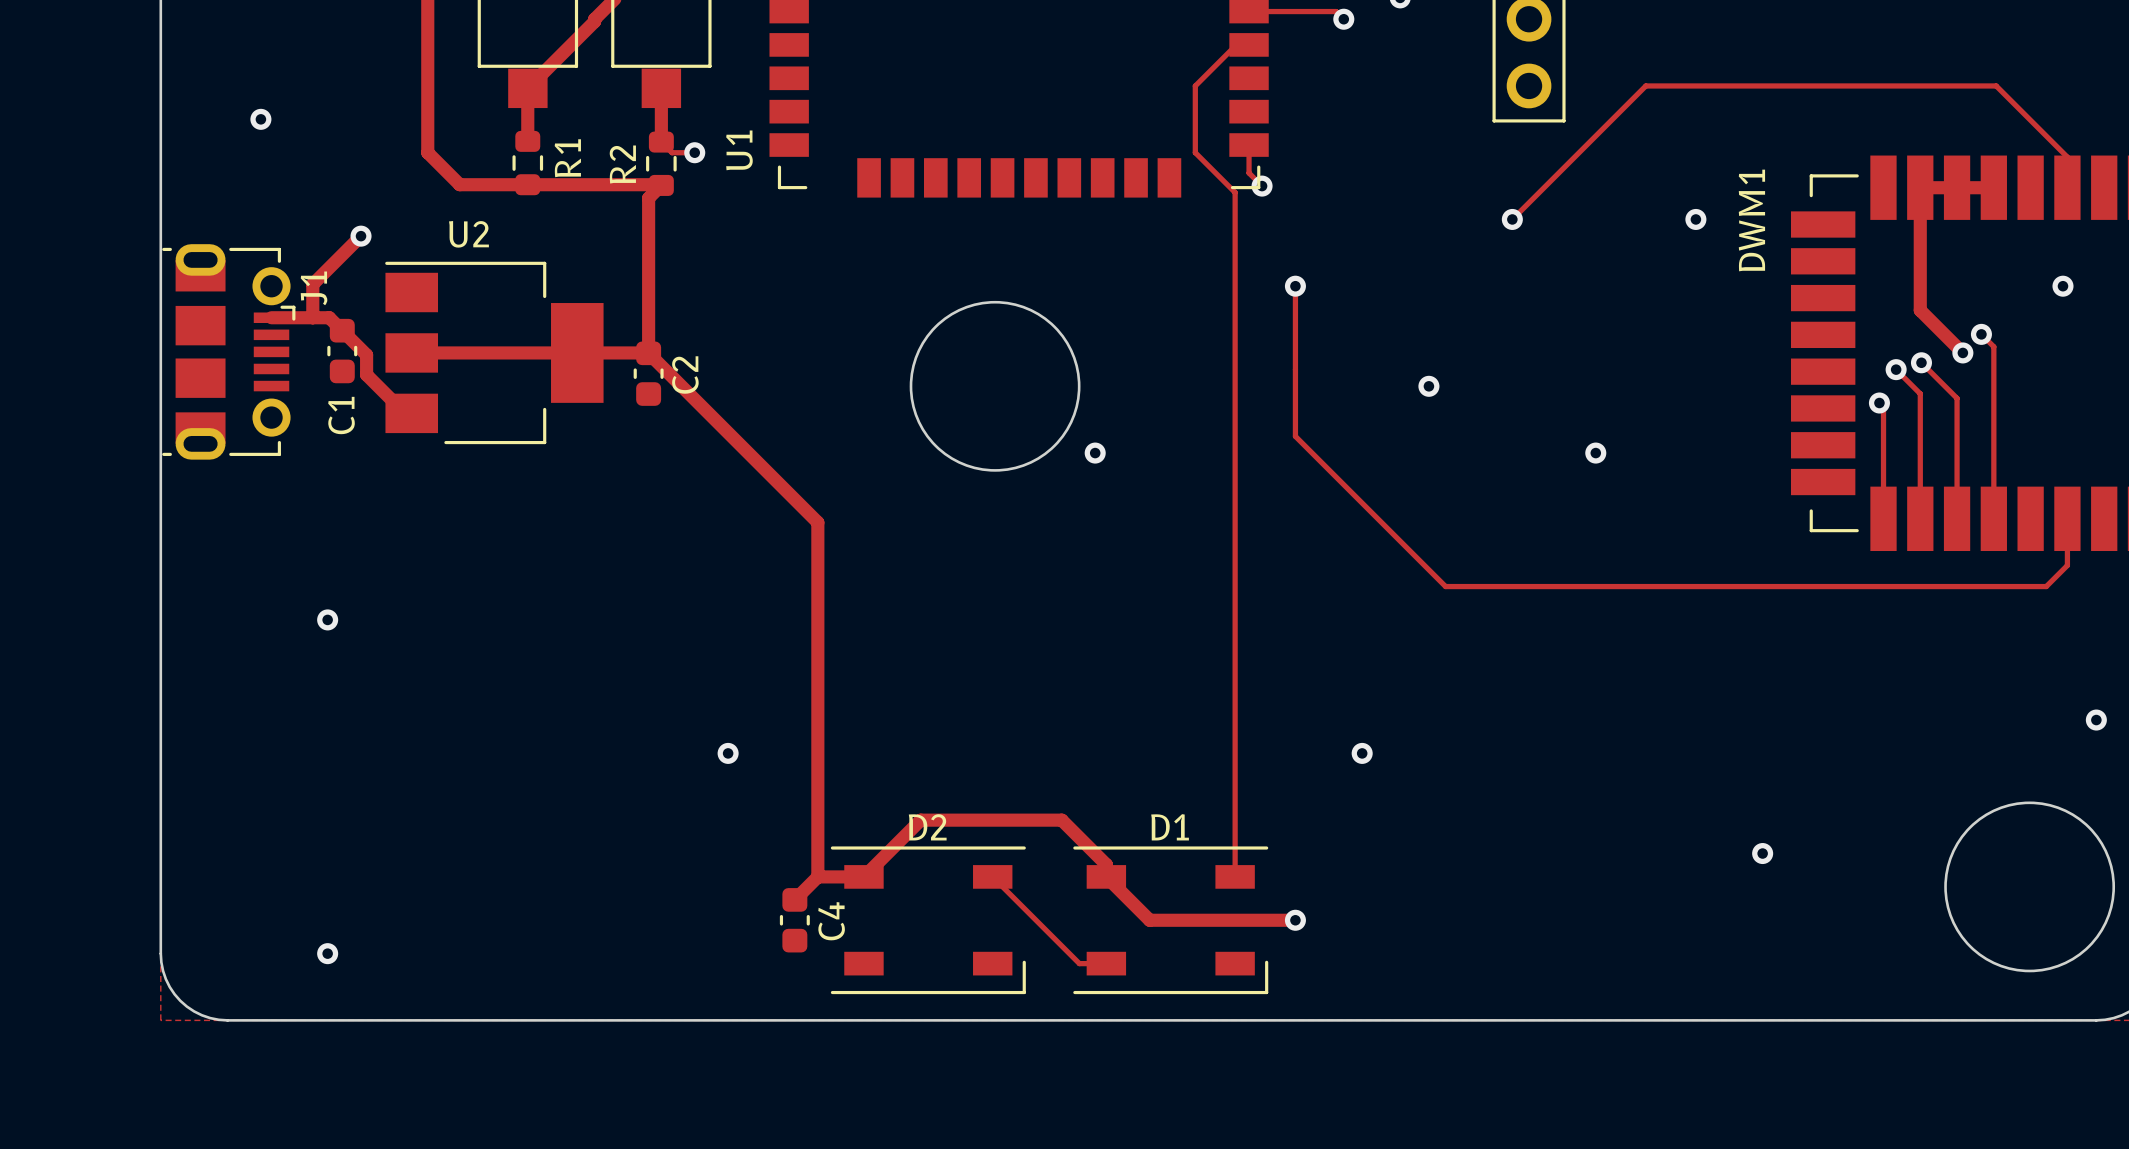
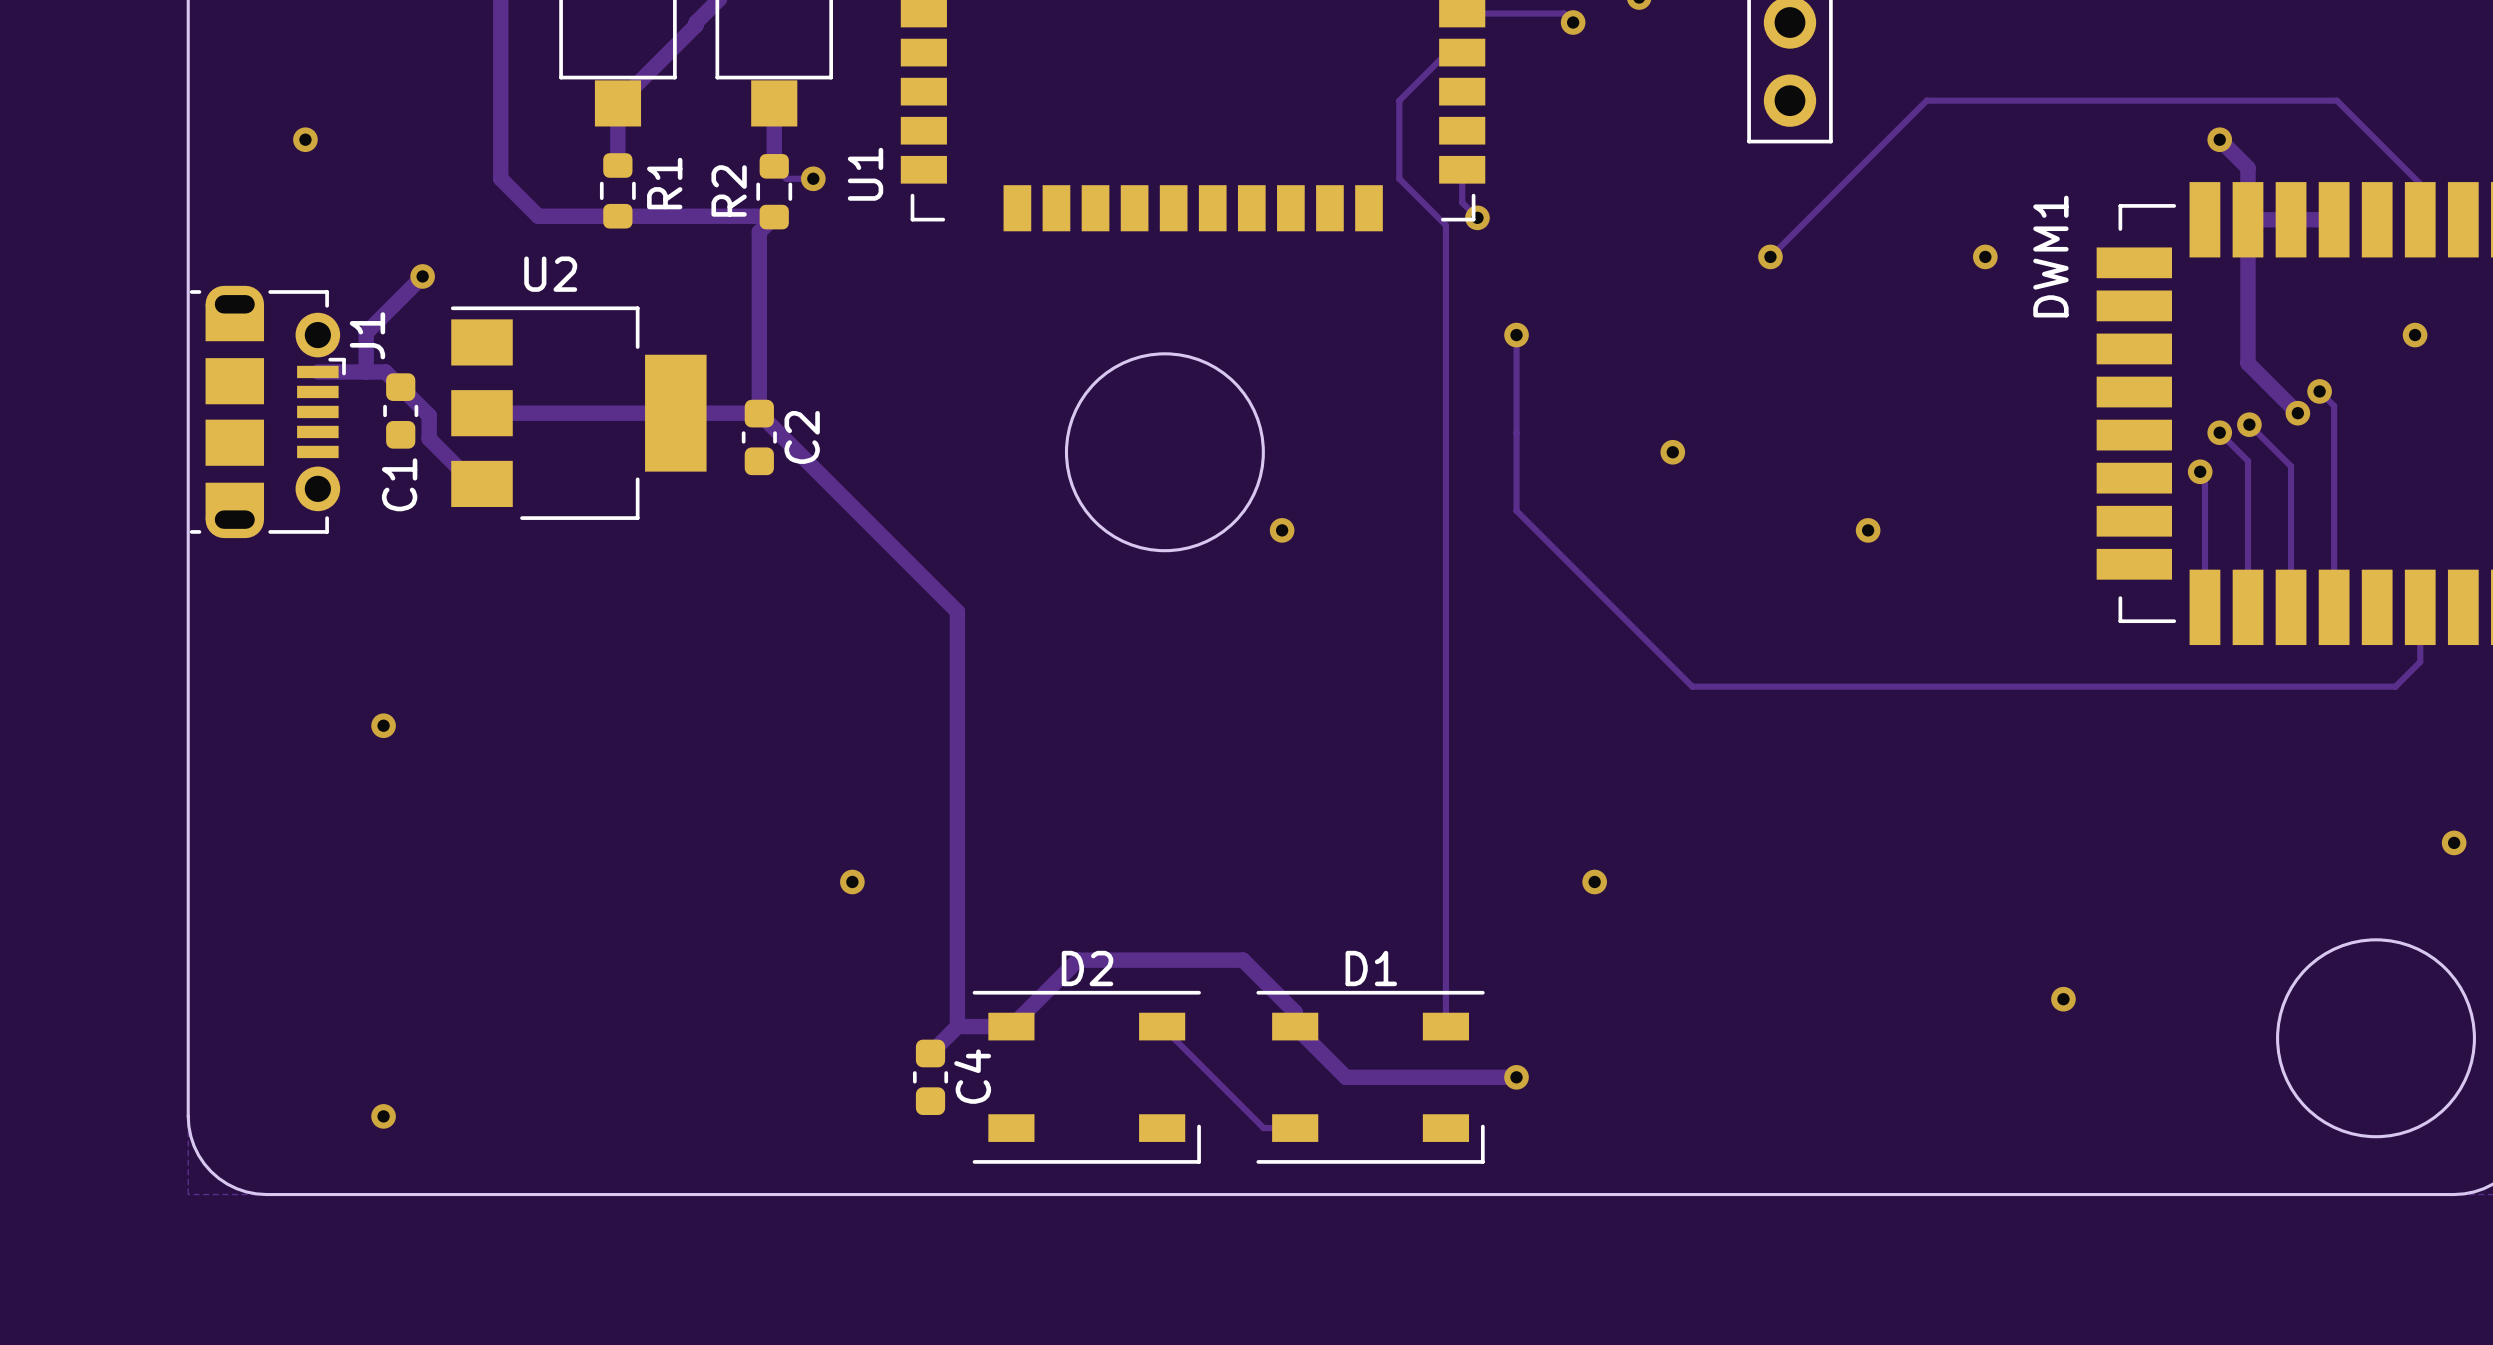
track: none -> (2219, 139) (2247, 167) (2247, 219)
via: none -> (2219, 139)

